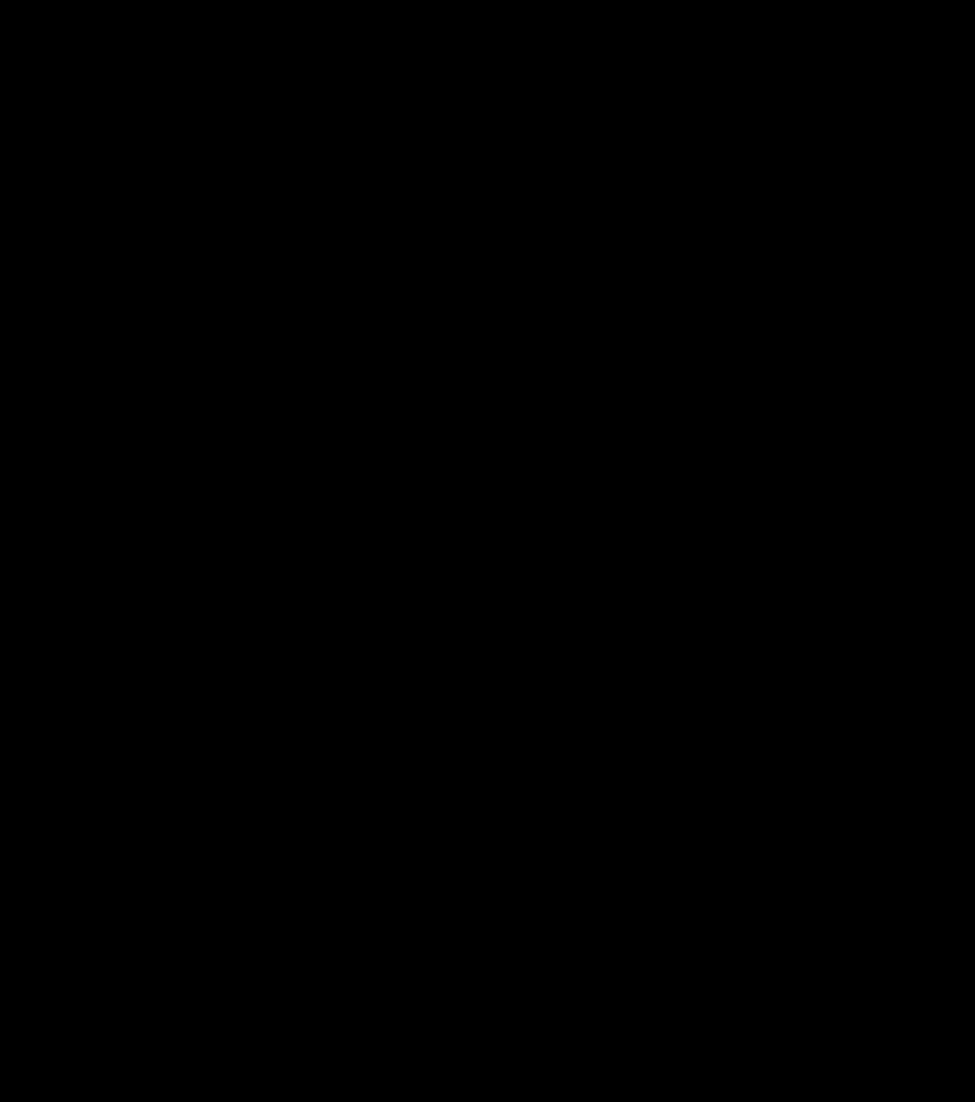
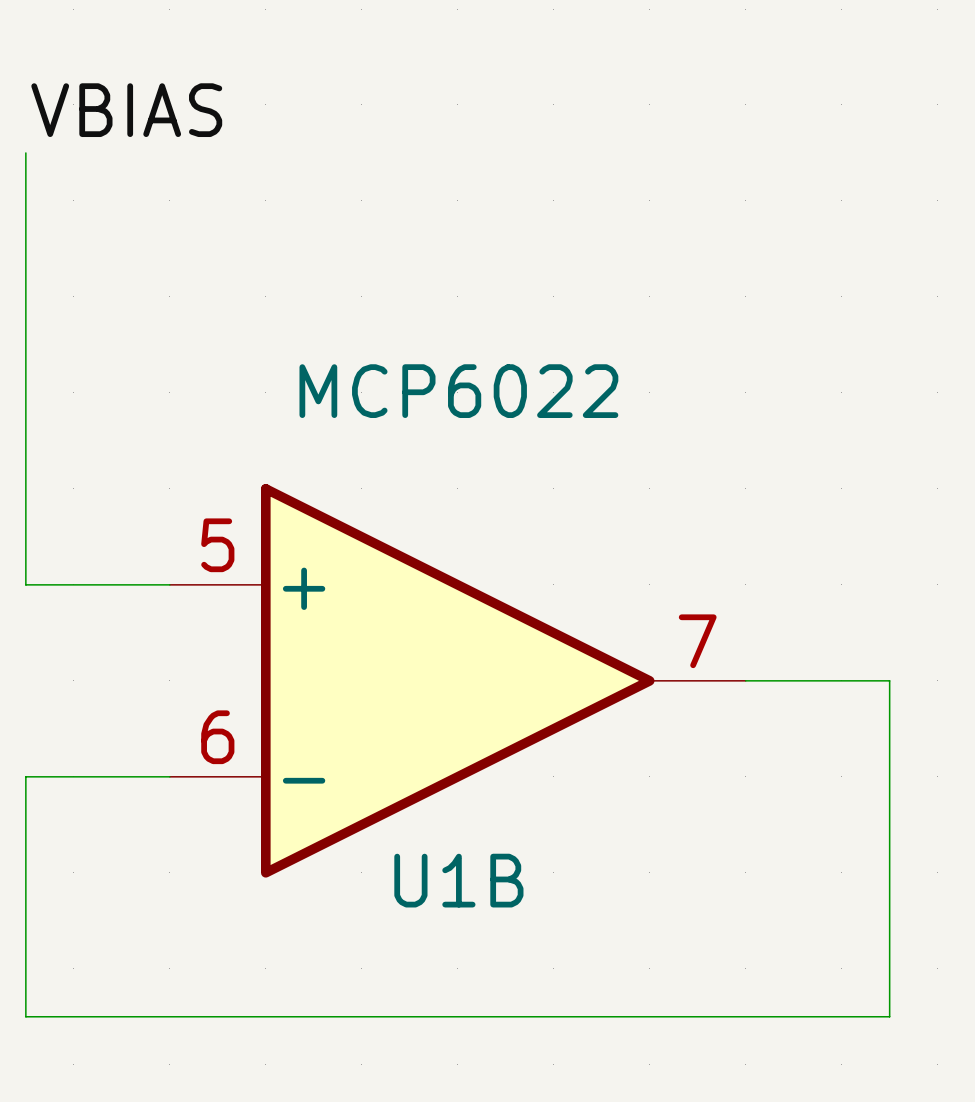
label: none -> VBIAS (126, 110)
wire: none -> (25, 152) (25, 584) (169, 584)
U1B: none -> MCP6022 (457, 680)
wire: none -> (745, 680) (889, 680) (889, 1016) (25, 1016) (25, 776) (169, 776)

